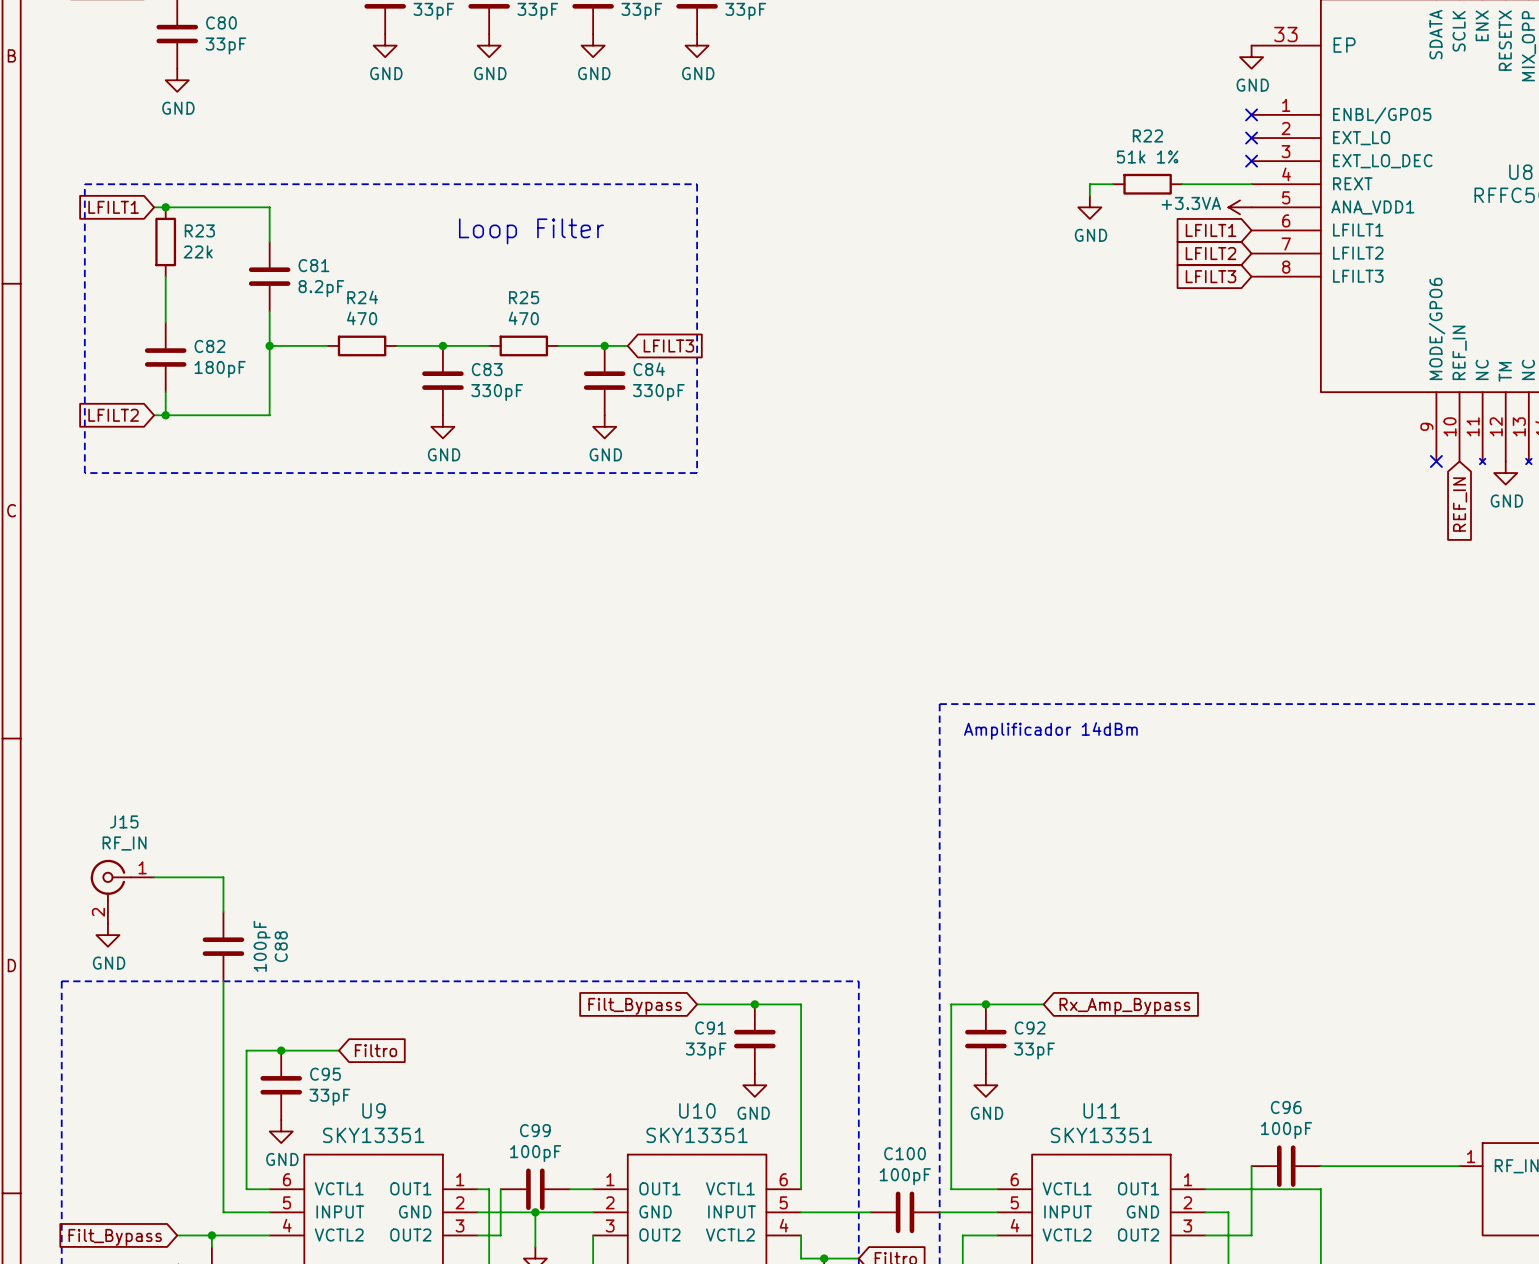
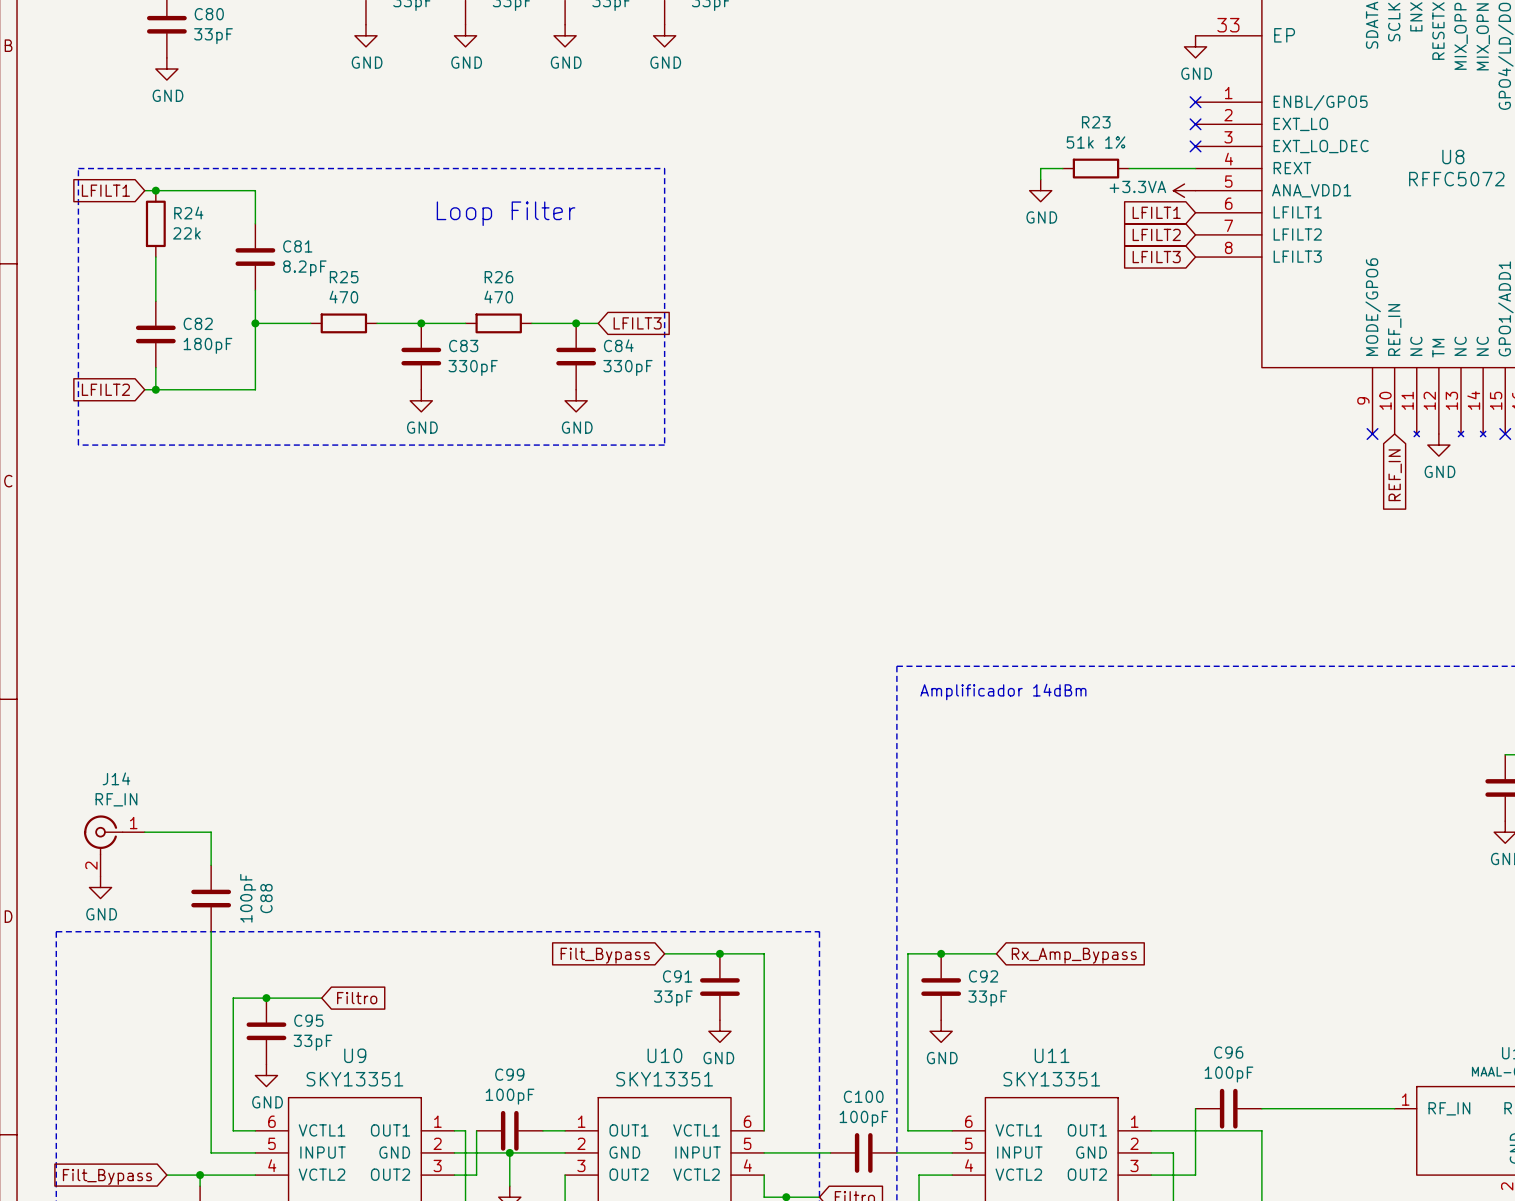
R22 name: R22 (1147, 135) -> R23 (1096, 122)
R23 name: R23 (199, 230) -> R24 (188, 213)
R24 name: R24 (362, 297) -> R25 (344, 277)
R25 name: R25 (524, 297) -> R26 (498, 277)
J15 name: J15 (124, 821) -> J14 (116, 778)

